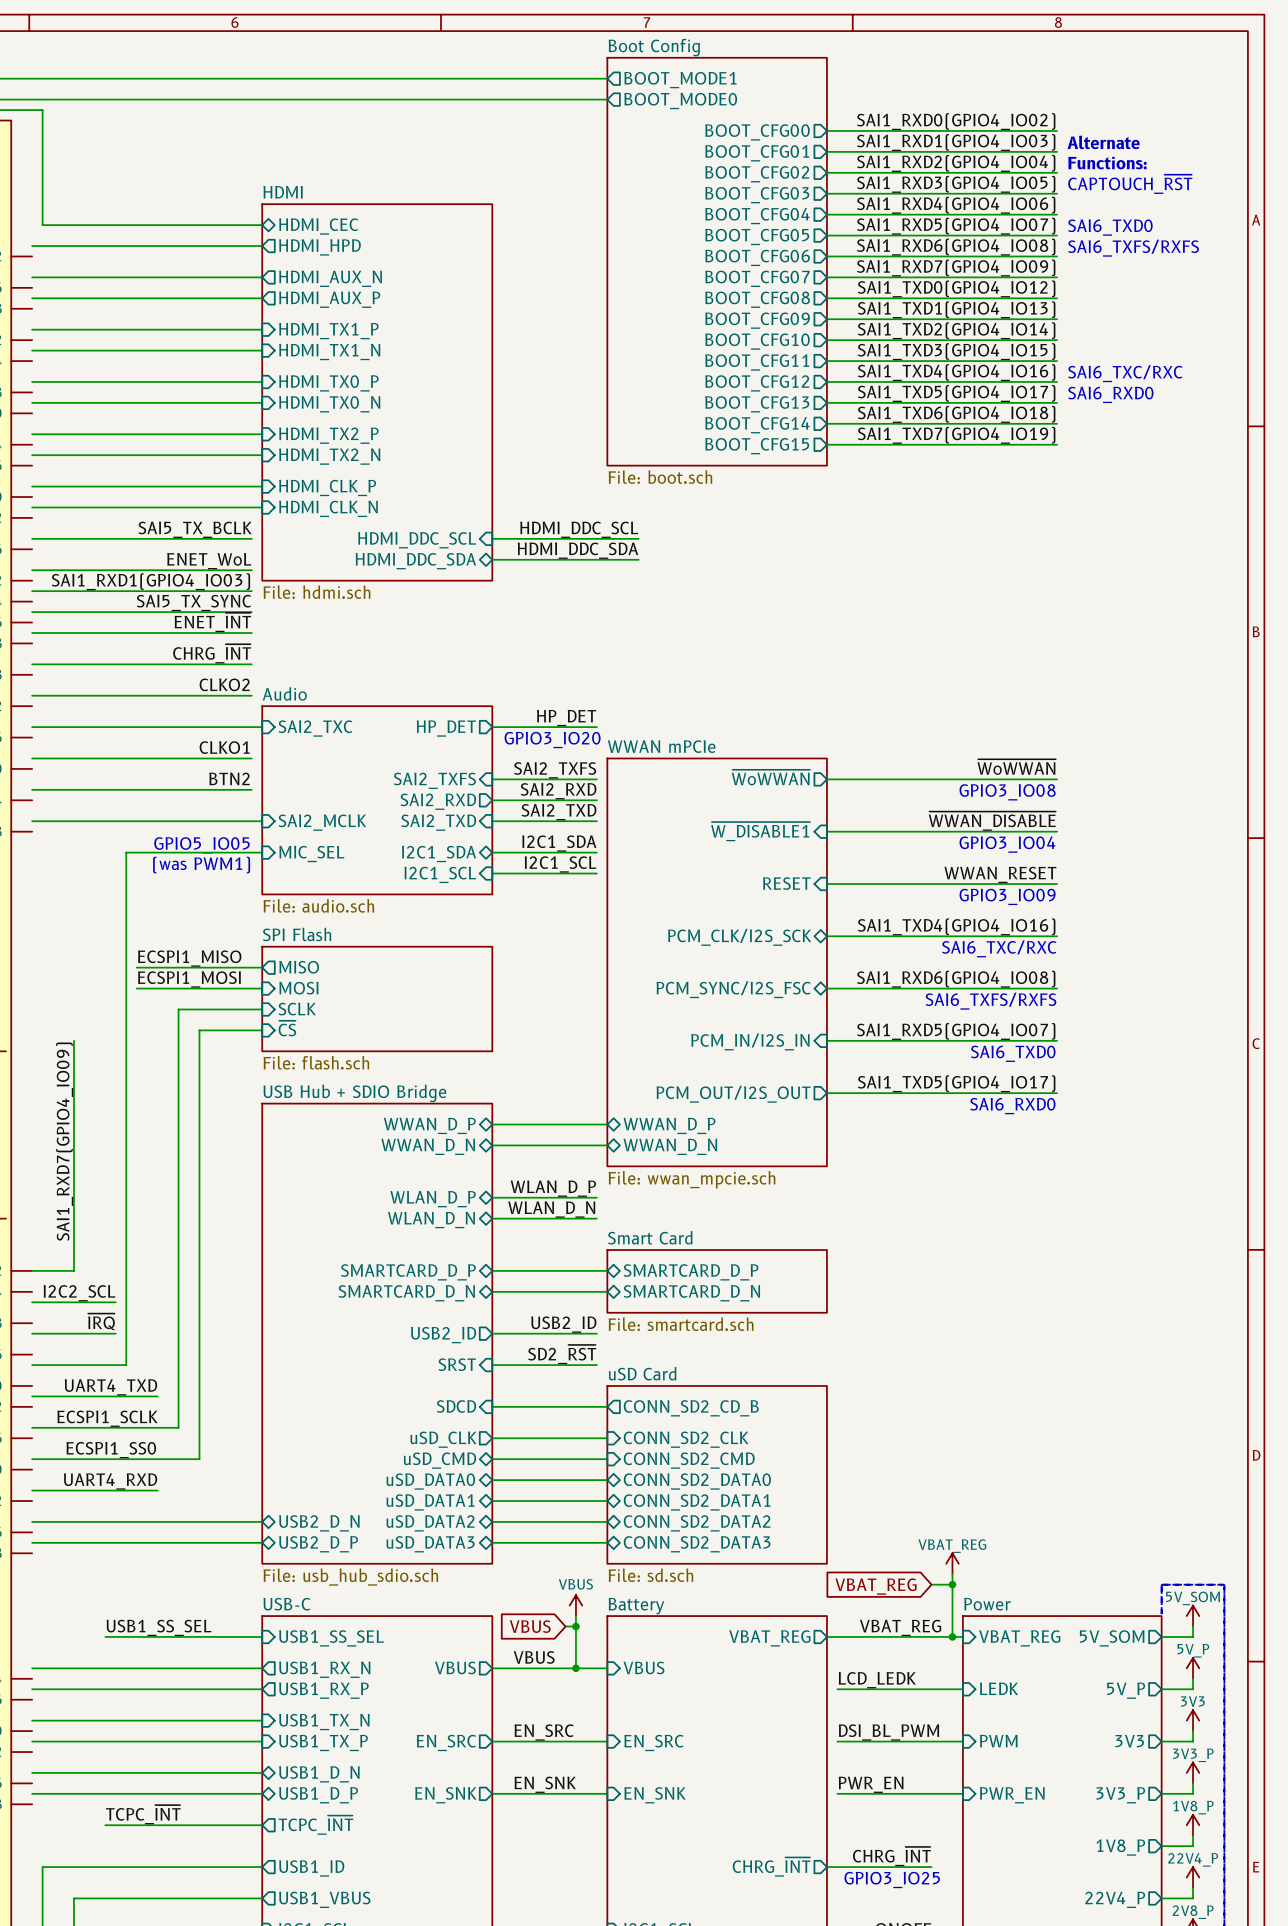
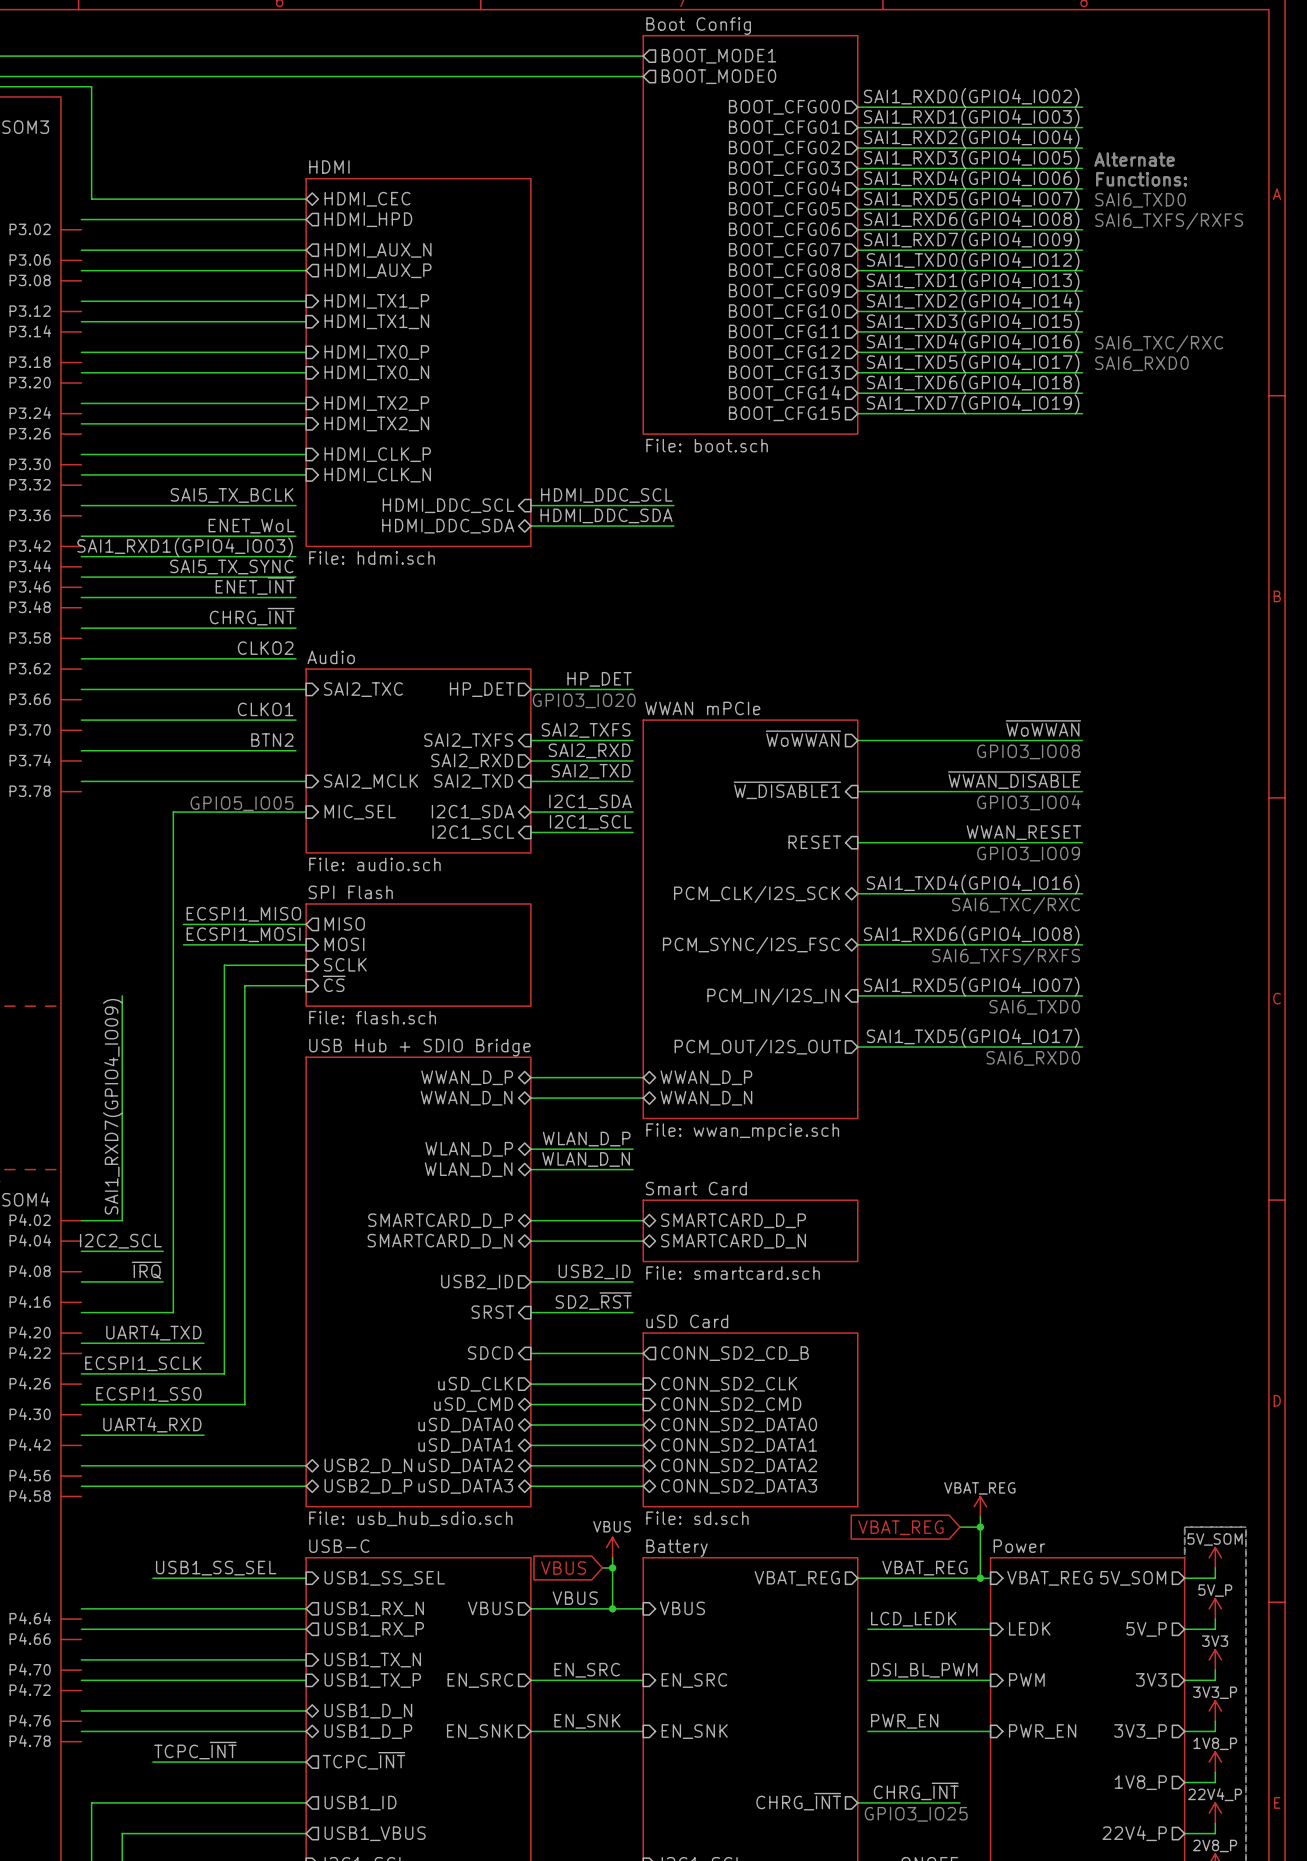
text: Alternate (1103, 142) -> none
text position: Functions: (1107, 163) -> Functions: (1141, 179)
text: CAPTOUCH_~{RST} (1130, 184) -> Alternate (1134, 159)
text: (was PWM1) (201, 865) -> none

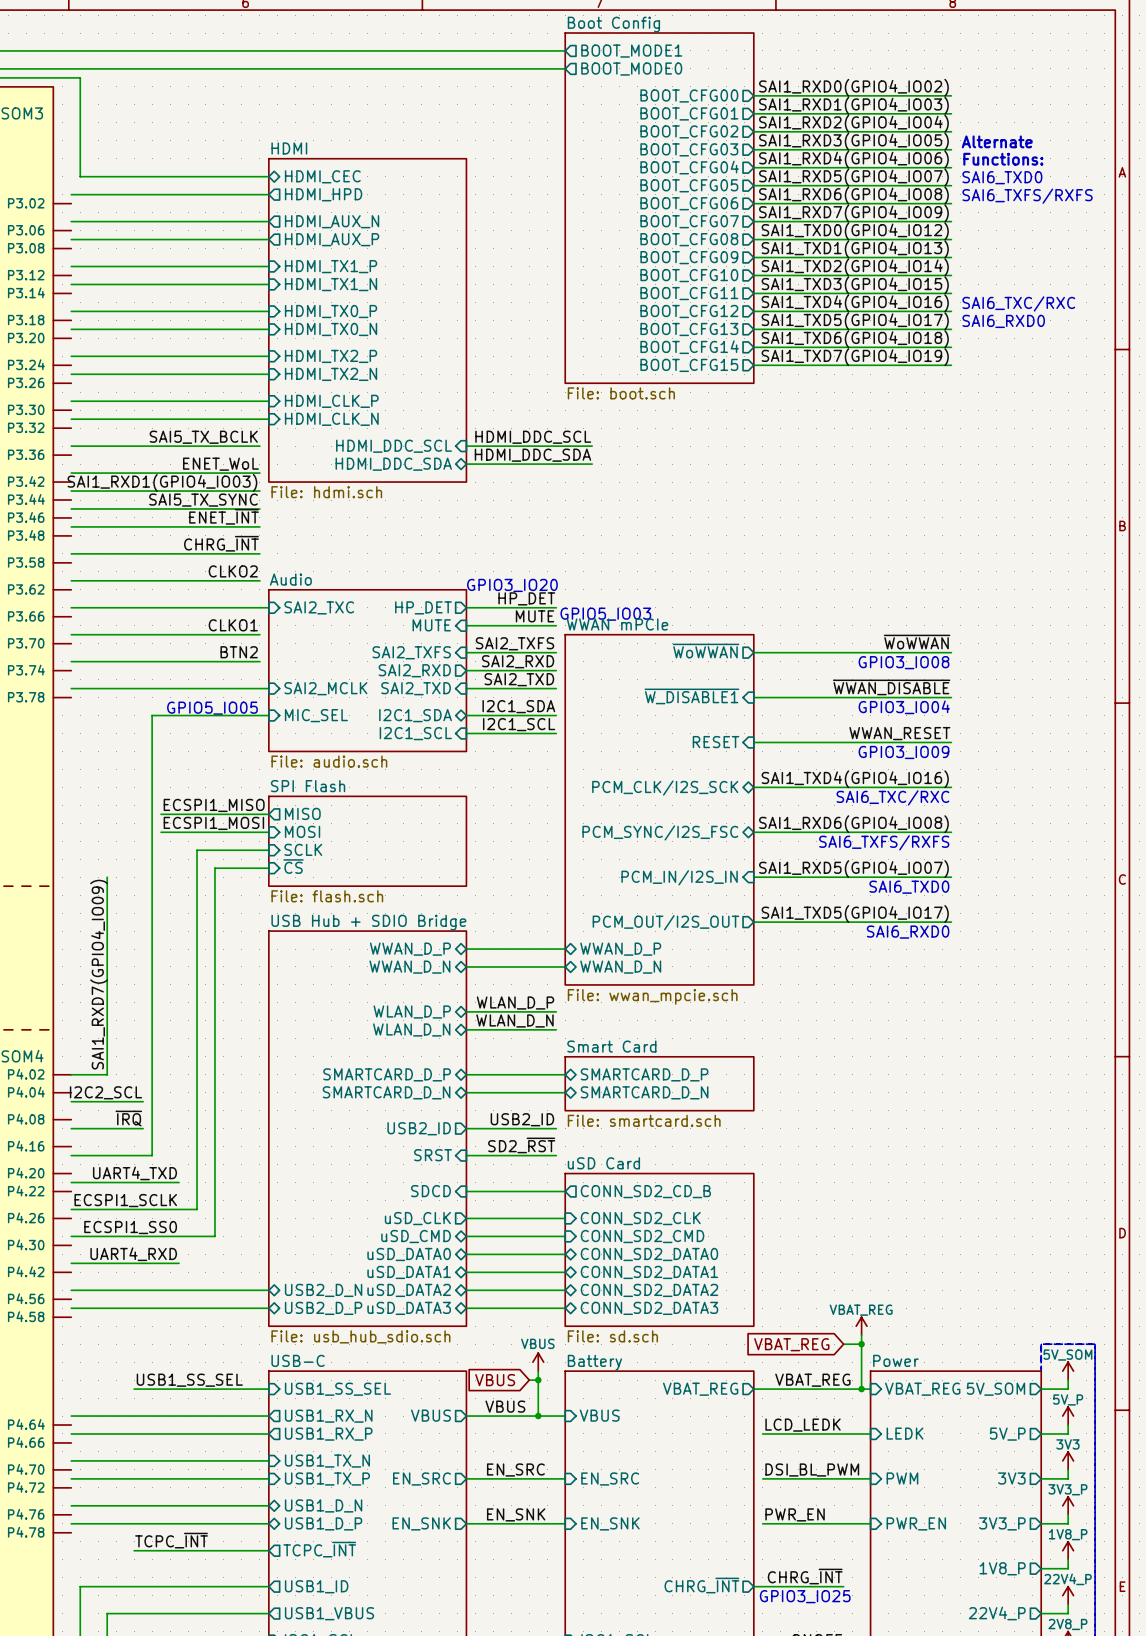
text: none -> GPIO5_IO03 (605, 614)
label: none -> MUTE (535, 616)
text position: GPIO3_IO20 (584, 700) -> GPIO3_IO20 (512, 585)
sheet pin: none -> MUTE (431, 625)
wire: none -> (466, 625) (556, 625)

